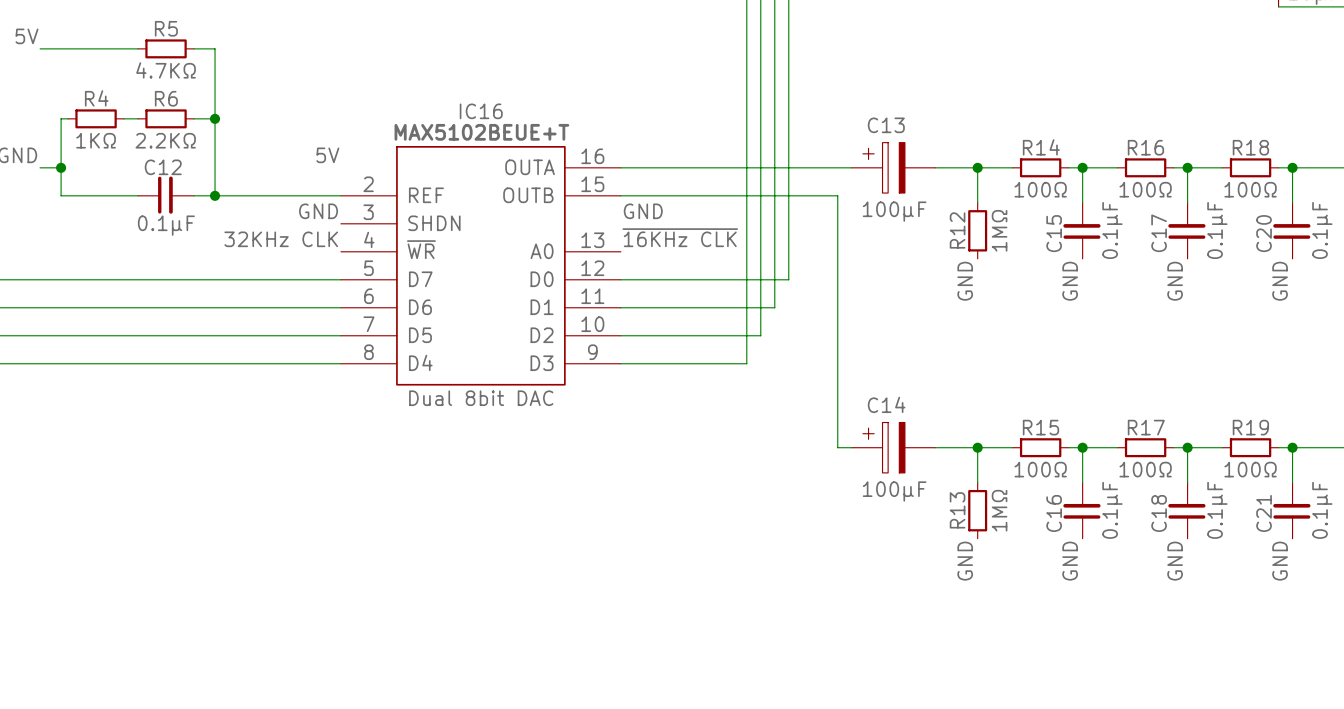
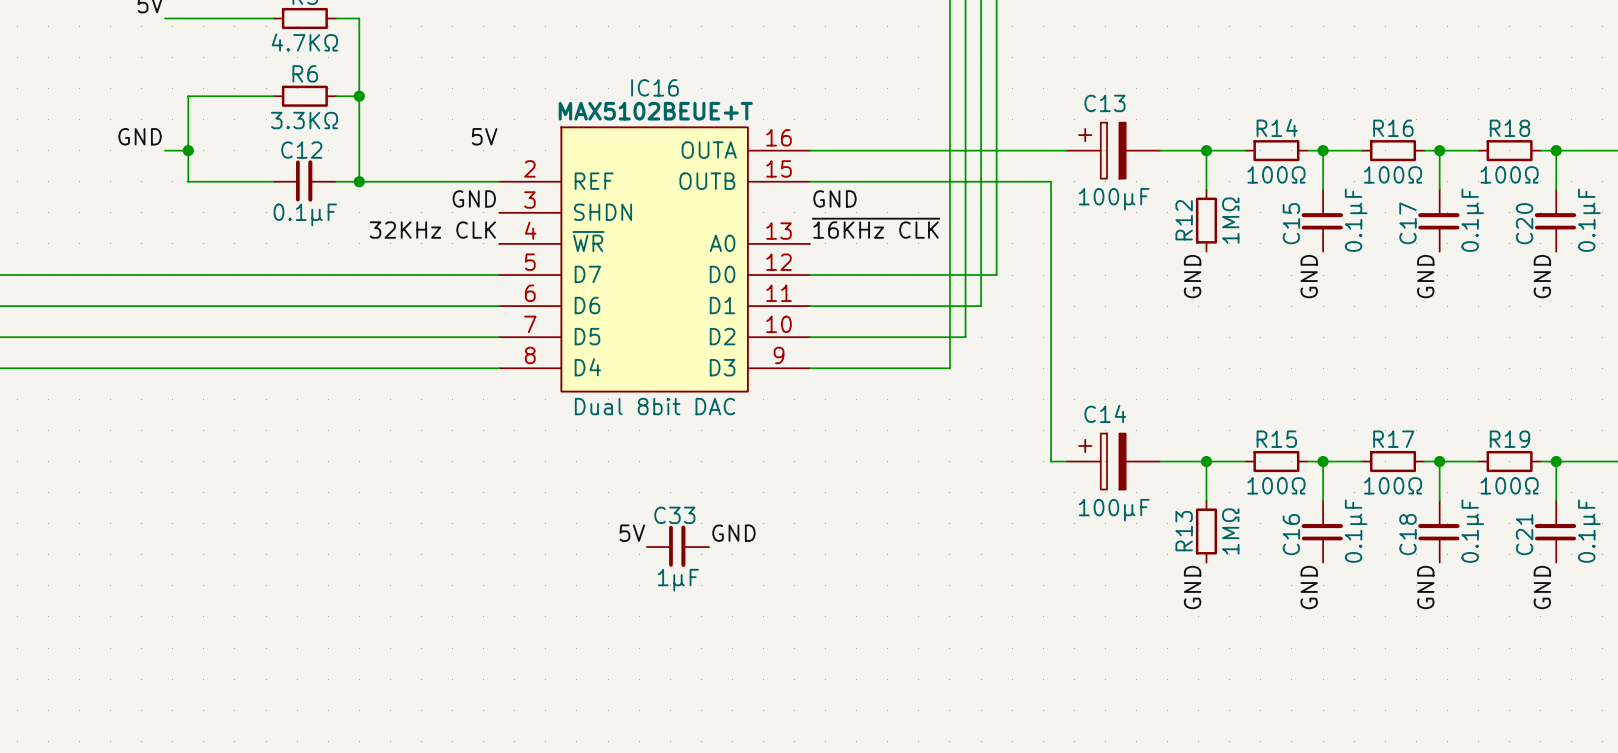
wire: none -> (196, 96) (258, 96)
R4: (96, 118) -> none
R6 text: 2.2KΩ (165, 140) -> 3.3KΩ (304, 120)
label: none -> 5V (632, 533)
label: none -> GND (733, 533)
C33: none -> (677, 546)

